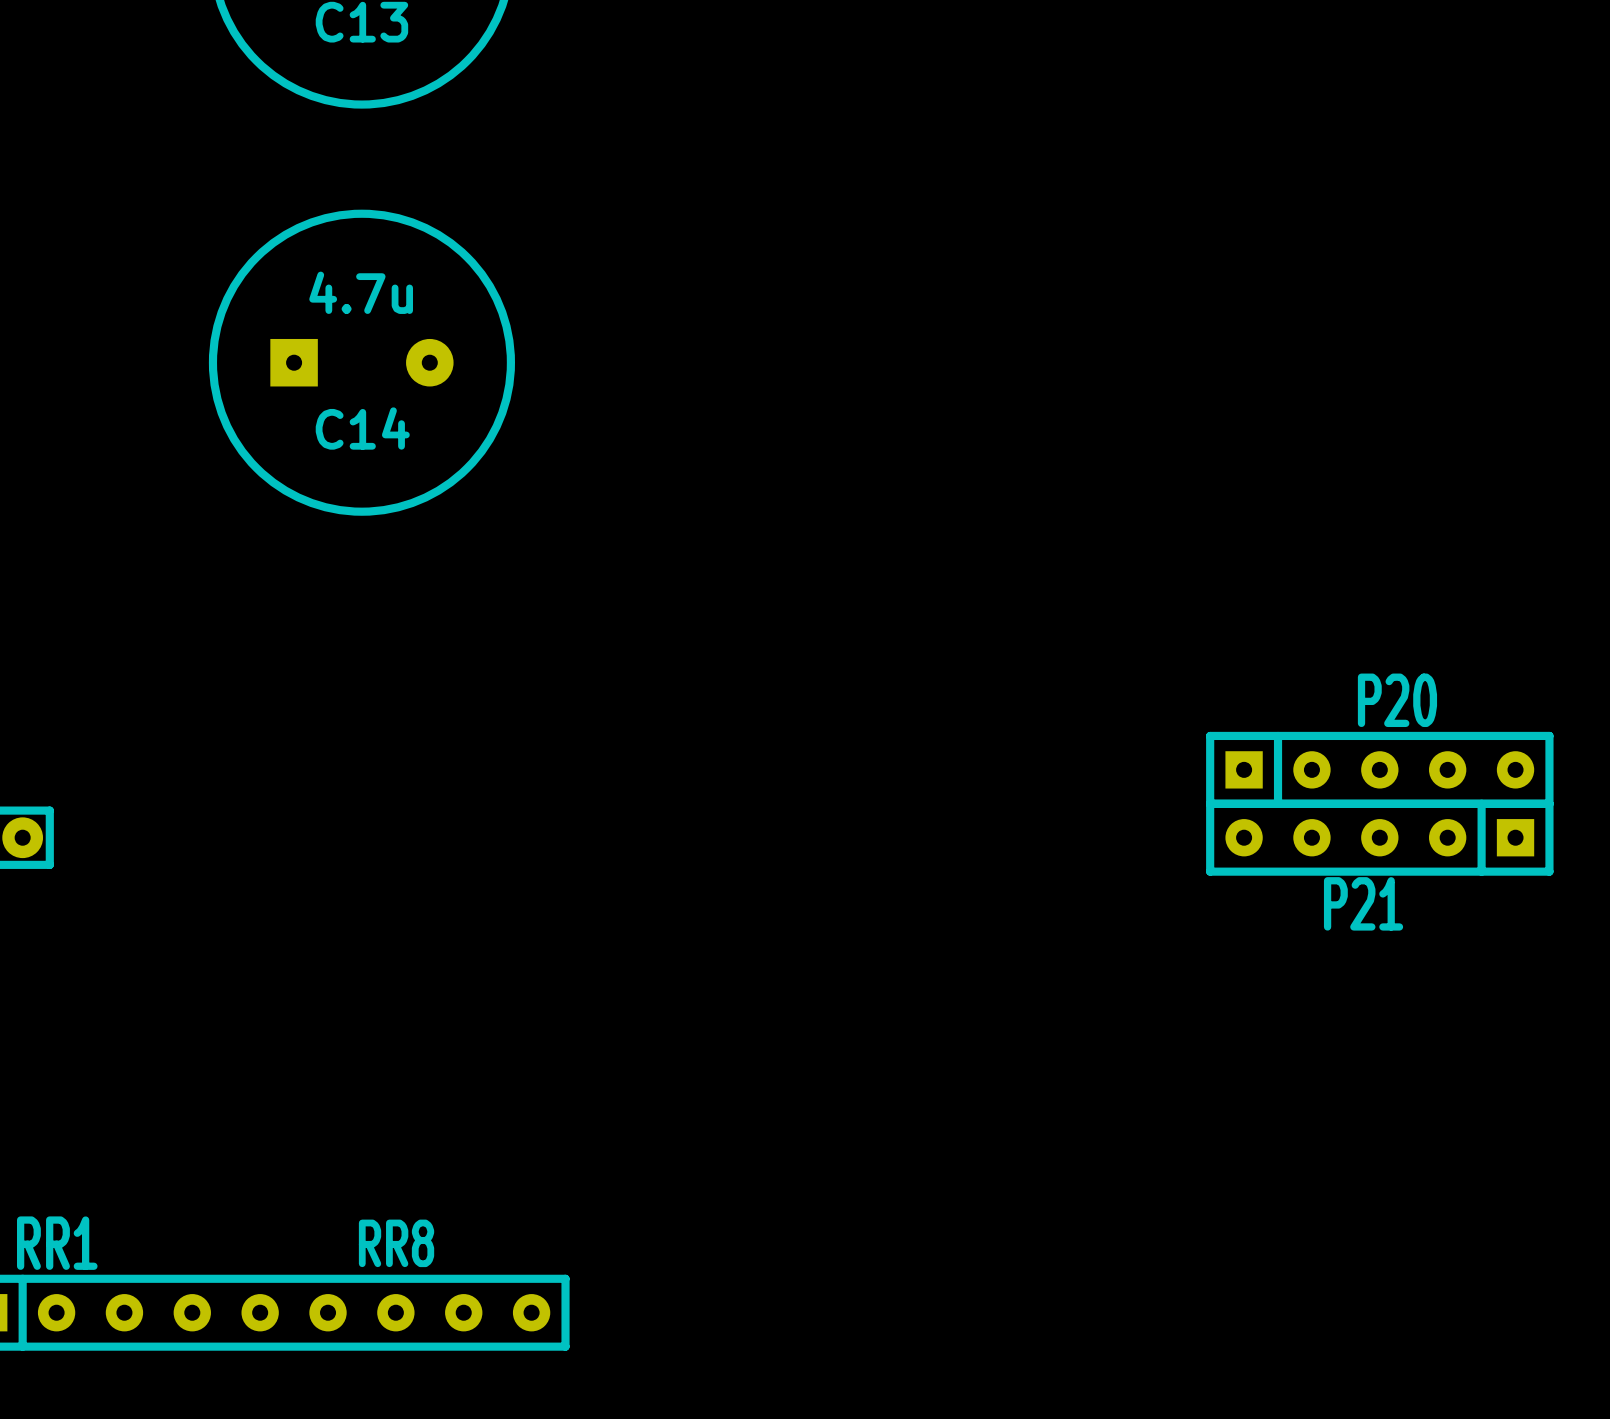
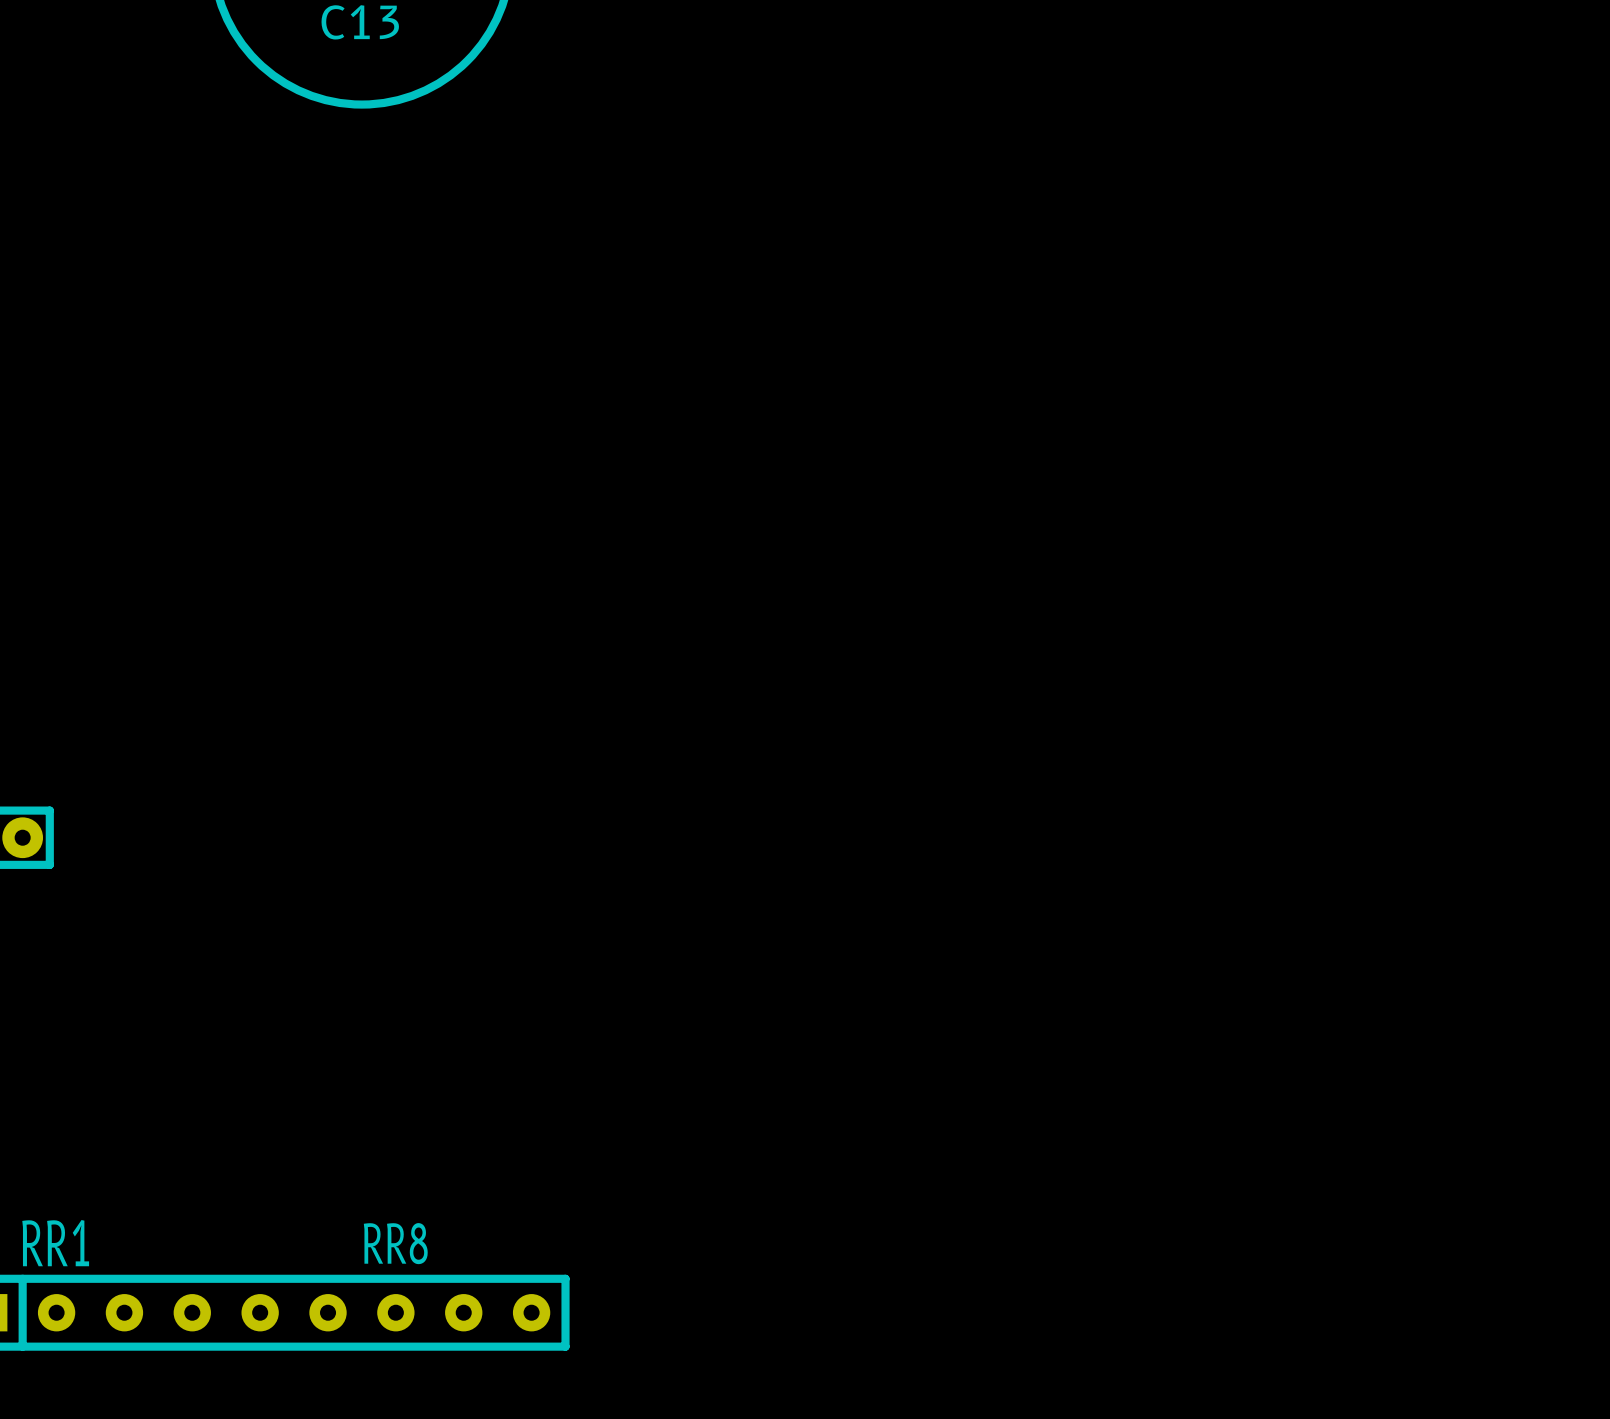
C14: 4.7u (361, 362) -> none
P20: (1379, 769) -> none
P21: (1379, 837) -> none

